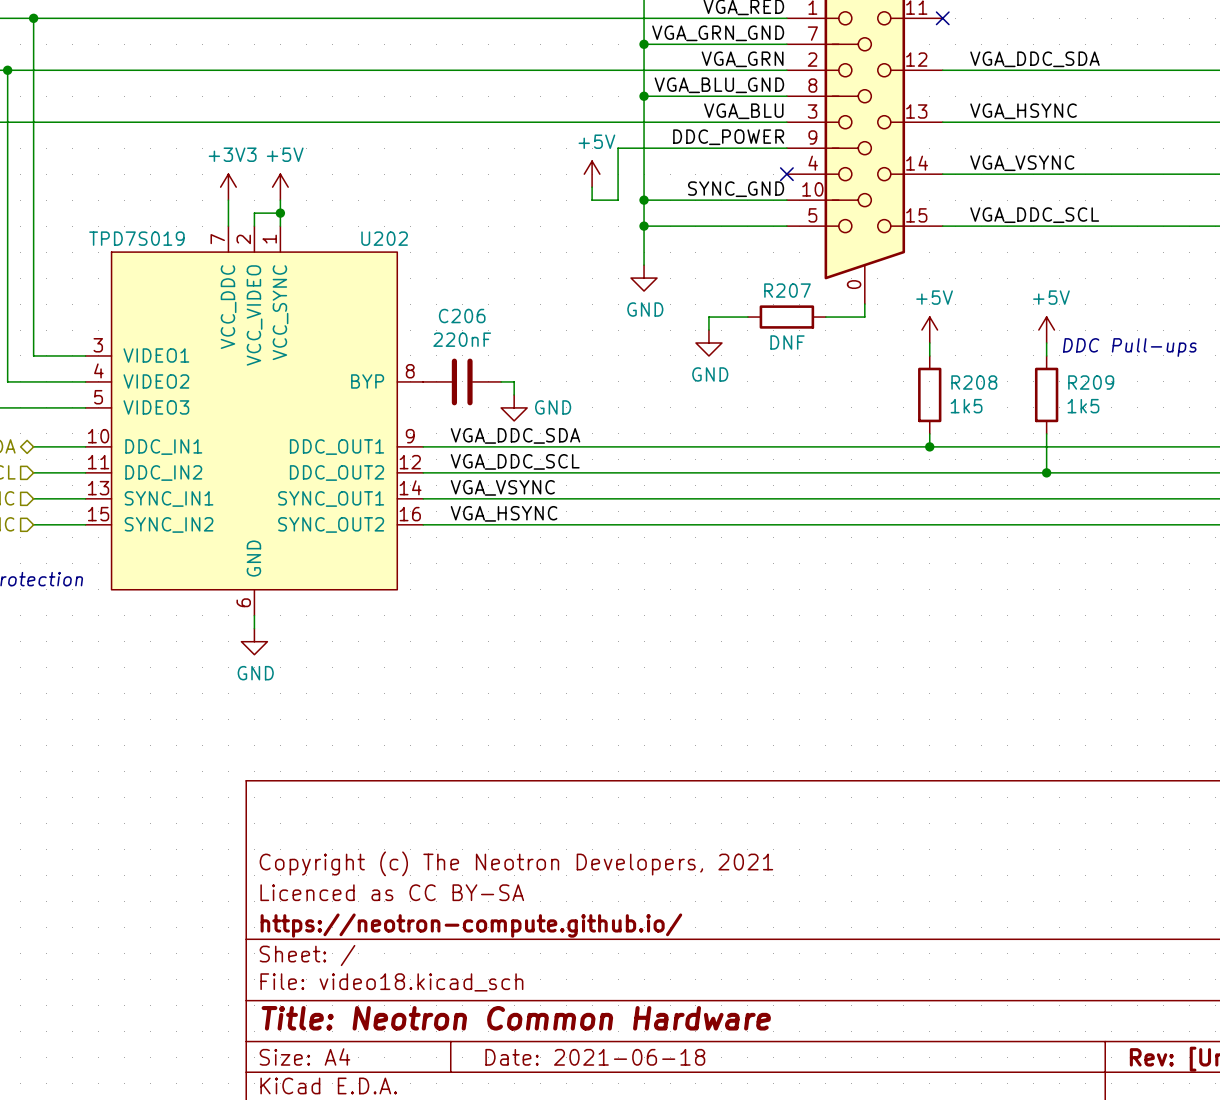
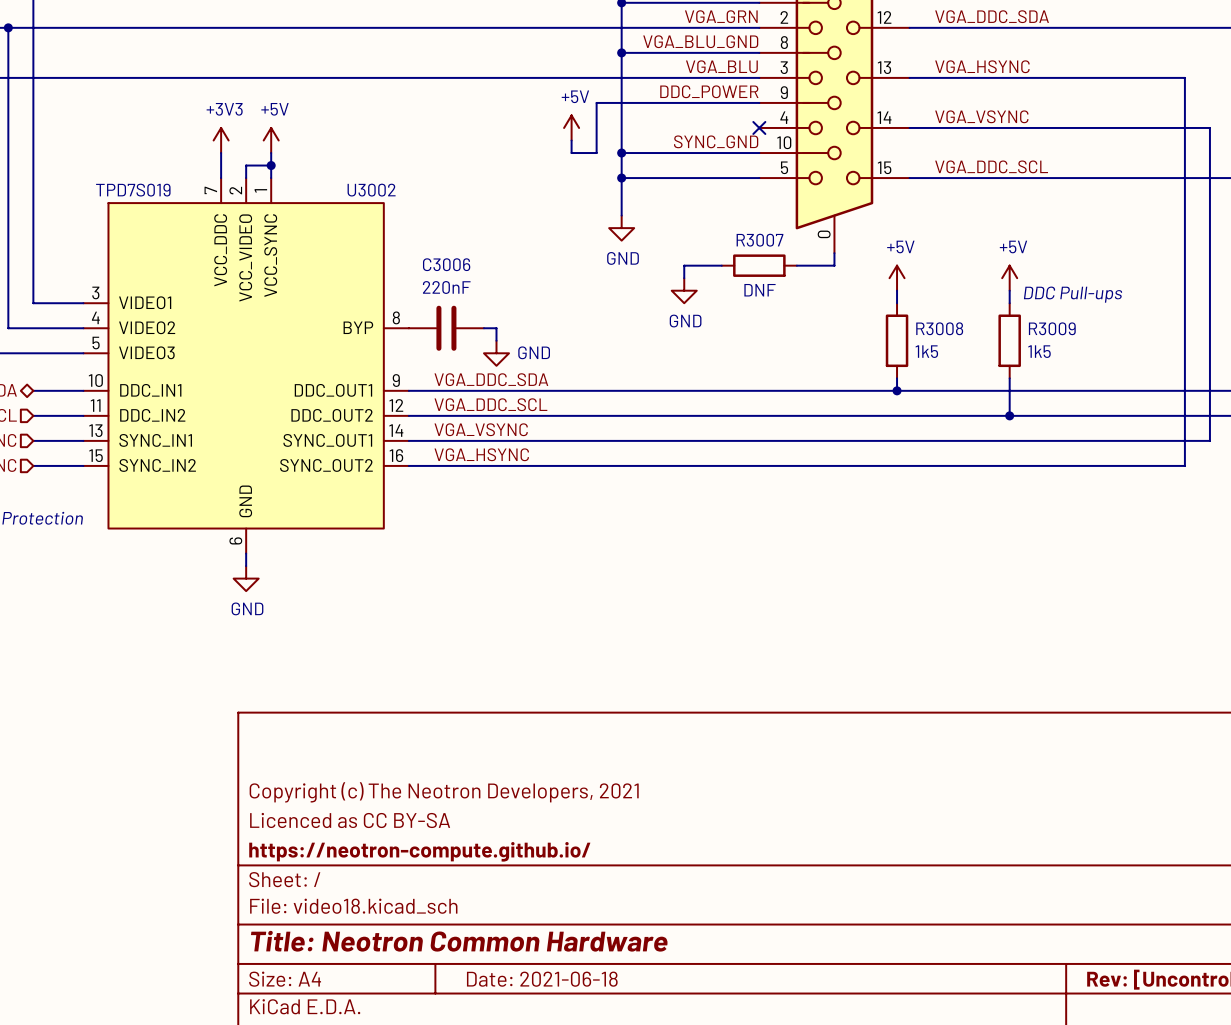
U202 name: U202 (384, 238) -> U3002 (371, 190)
R207 name: R207 (787, 290) -> R3007 (759, 240)
C206 name: C206 (462, 316) -> C3006 (446, 264)
R208 name: R208 (974, 382) -> R3008 (939, 328)
R209 name: R209 (1091, 382) -> R3009 (1052, 328)

